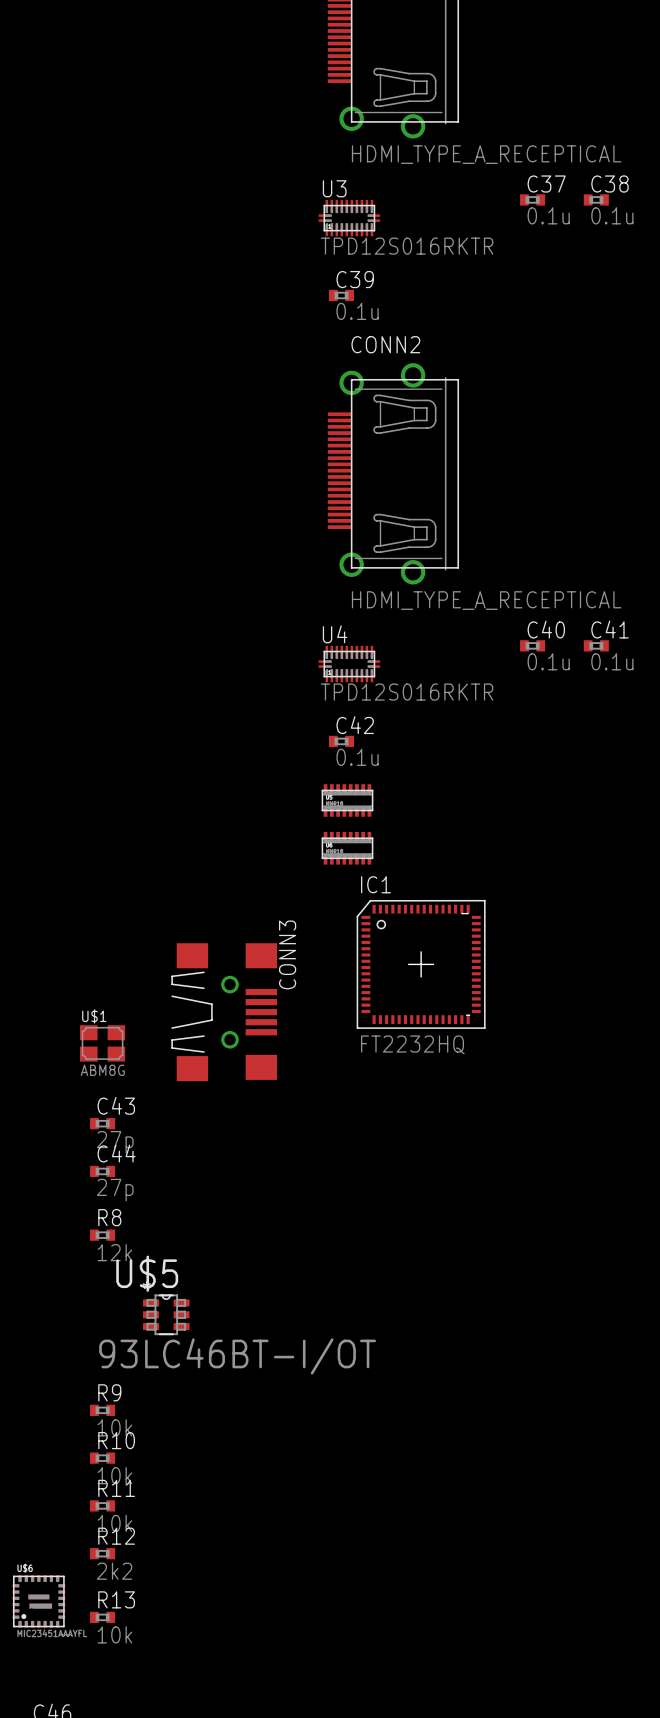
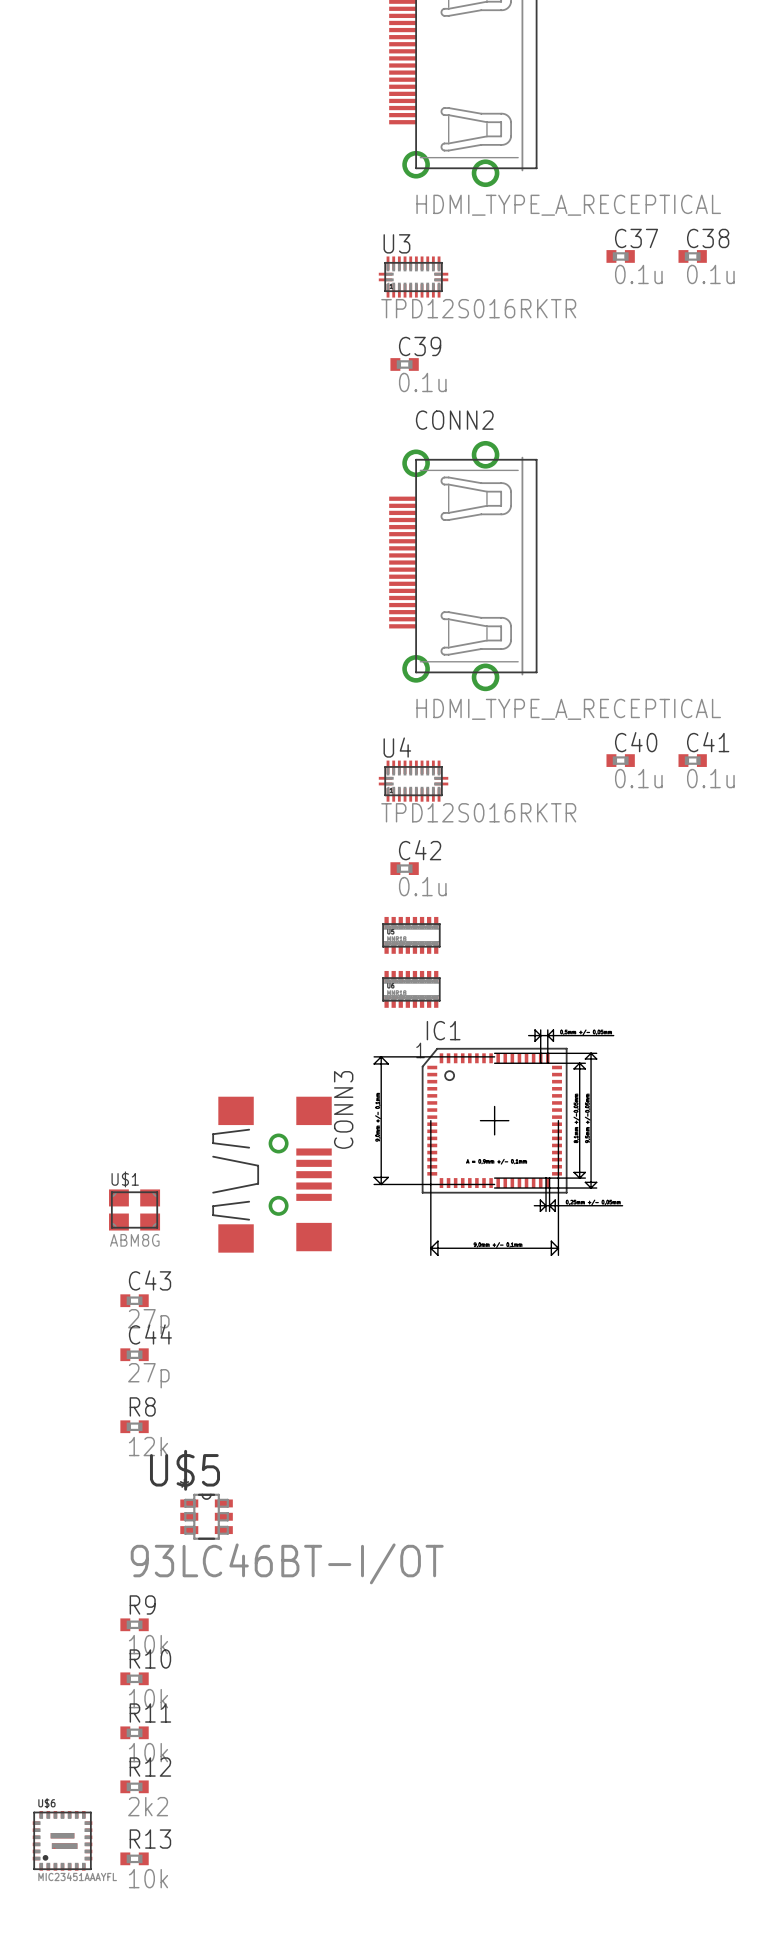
IC1 footprint: [356, 899, 486, 1029] -> [374, 1029, 623, 1256]
U$1 footprint: [80, 1025, 126, 1062] -> [109, 1189, 161, 1231]
IC1 value: FT2232HQ (412, 1044) -> none

